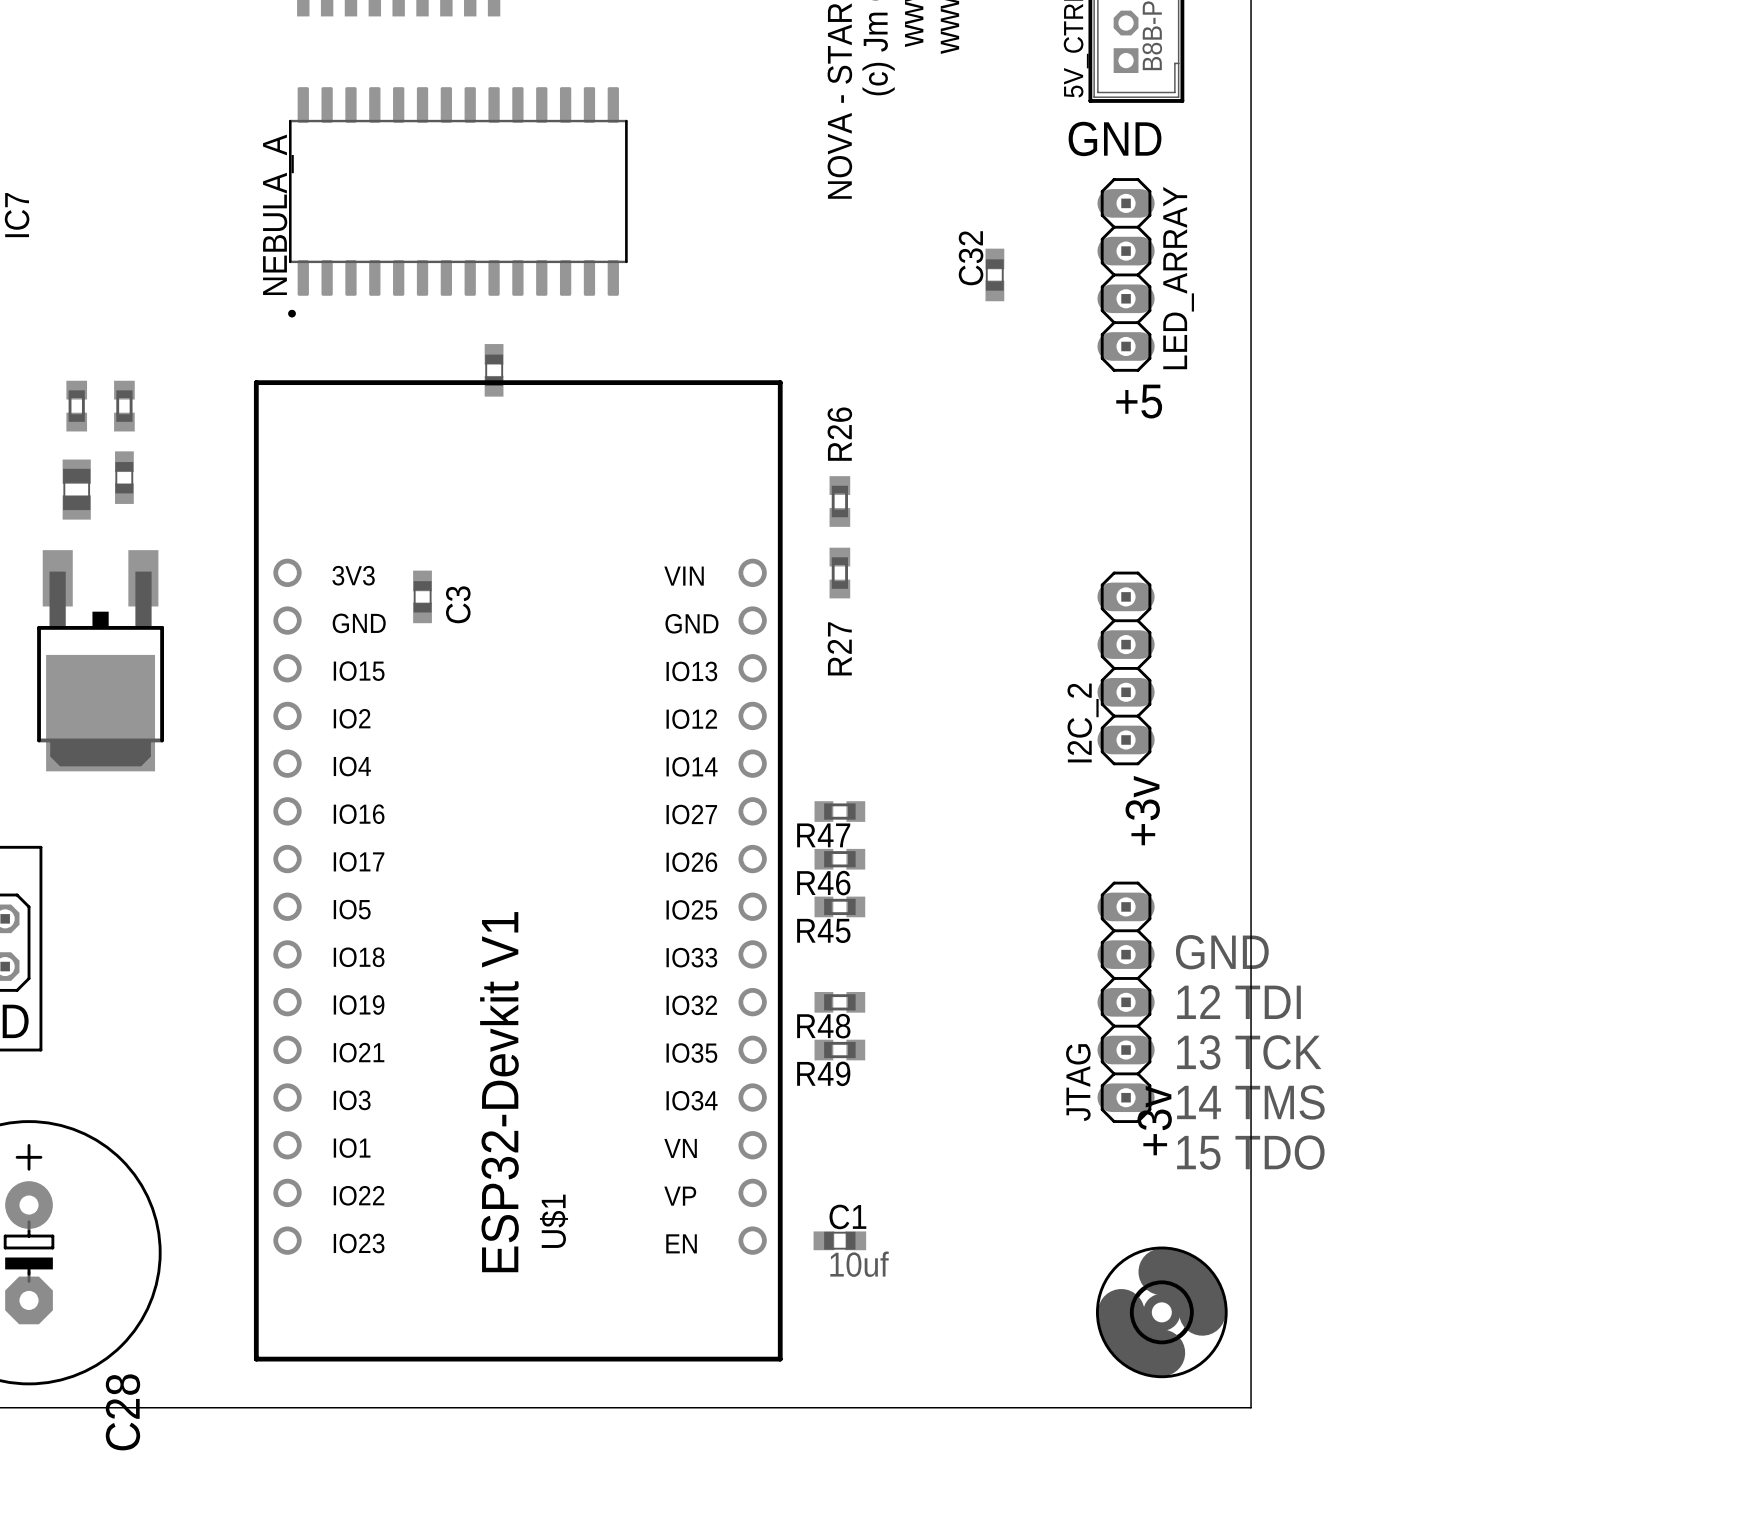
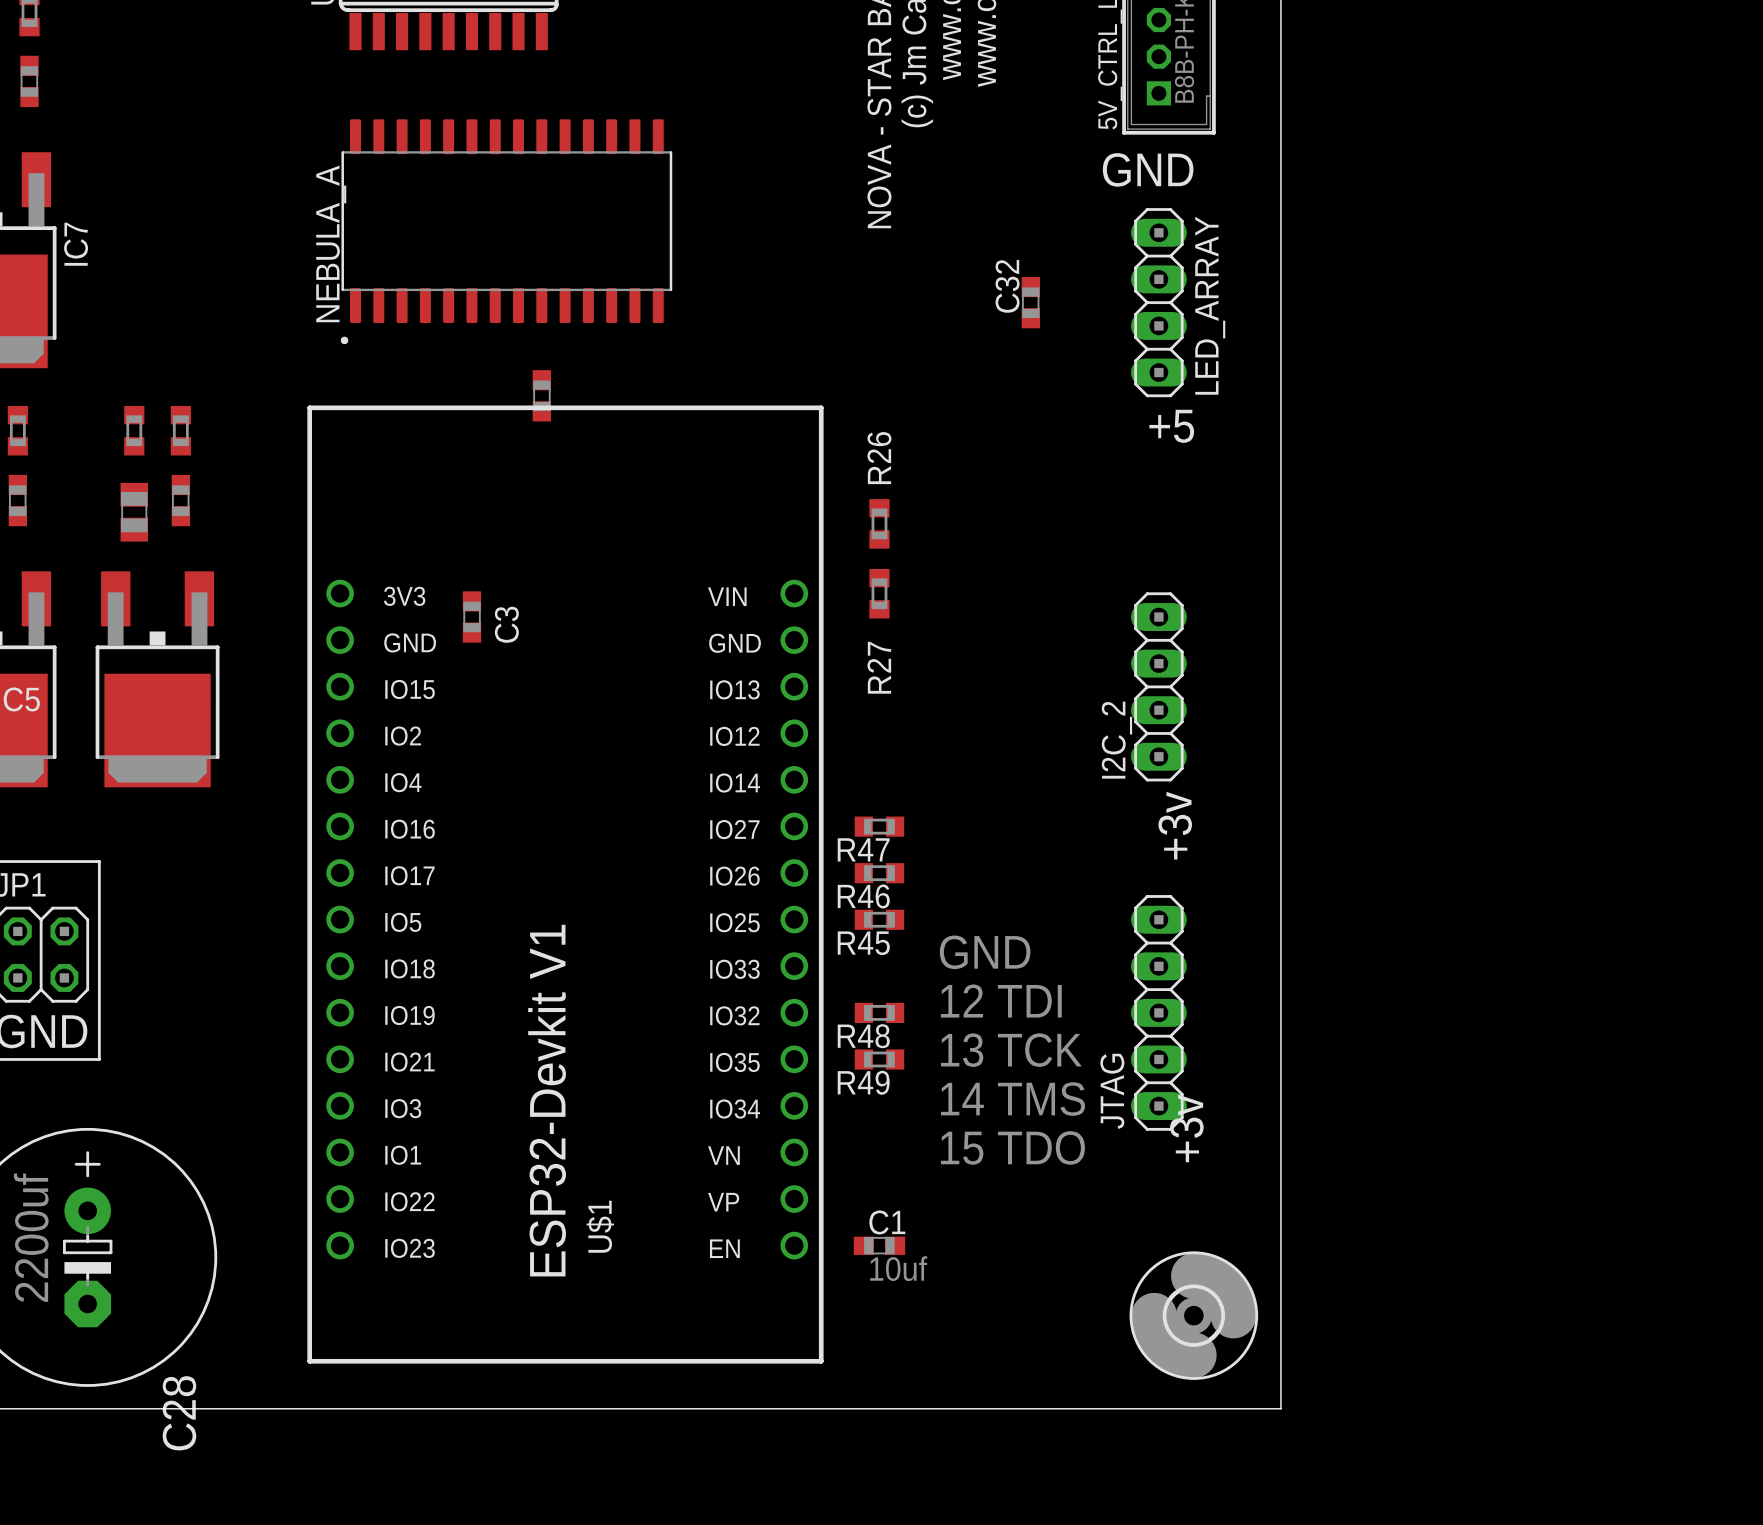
text position: GND (1222, 952) -> GND (985, 952)
text position: 12 TDI (1238, 1002) -> 12 TDI (1001, 1001)
text position: 13 TCK (1249, 1052) -> 13 TCK (1011, 1050)
text position: 14 TMS (1250, 1102) -> 14 TMS (1012, 1099)
text position: 15 TDO (1250, 1152) -> 15 TDO (1012, 1147)

